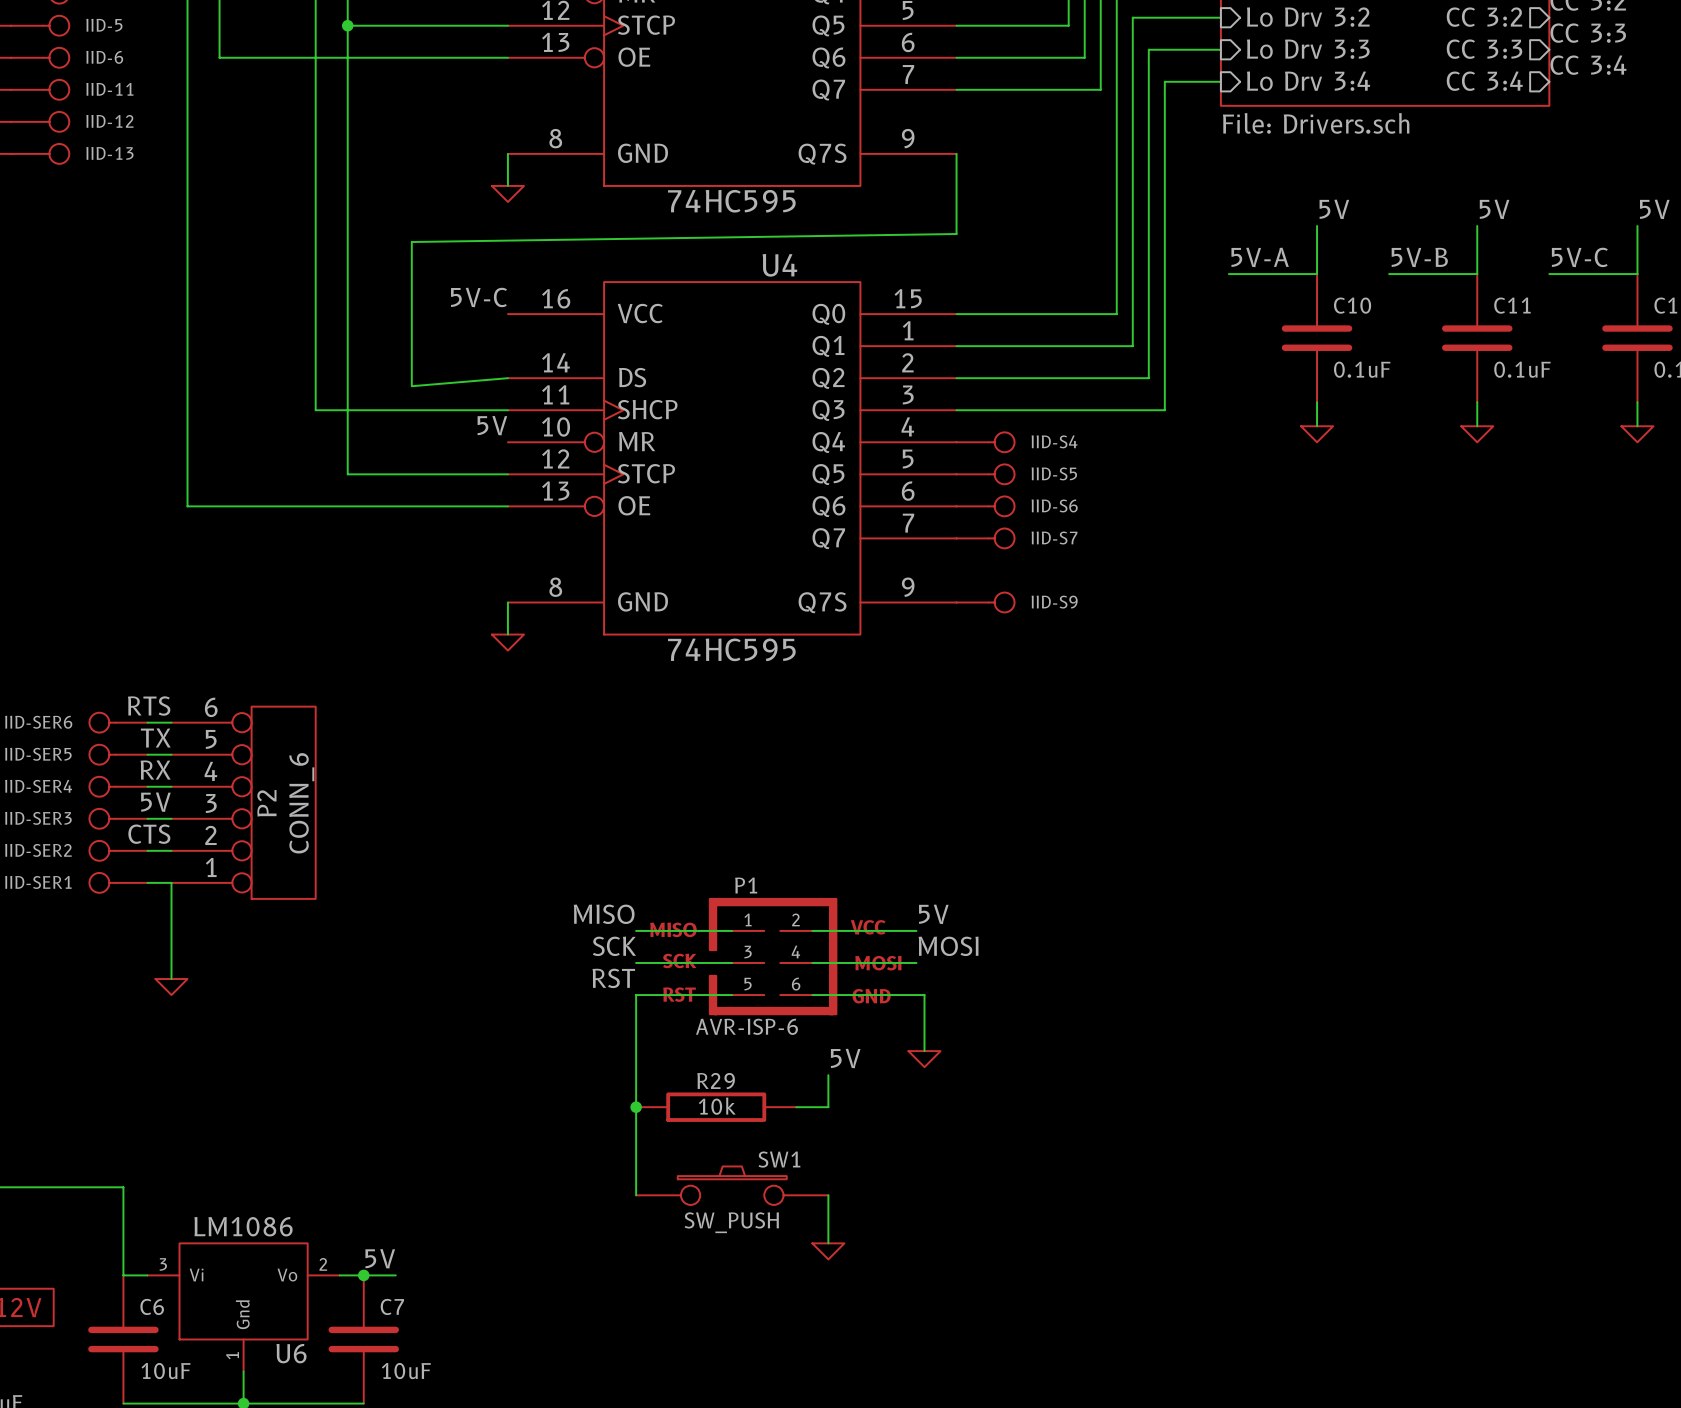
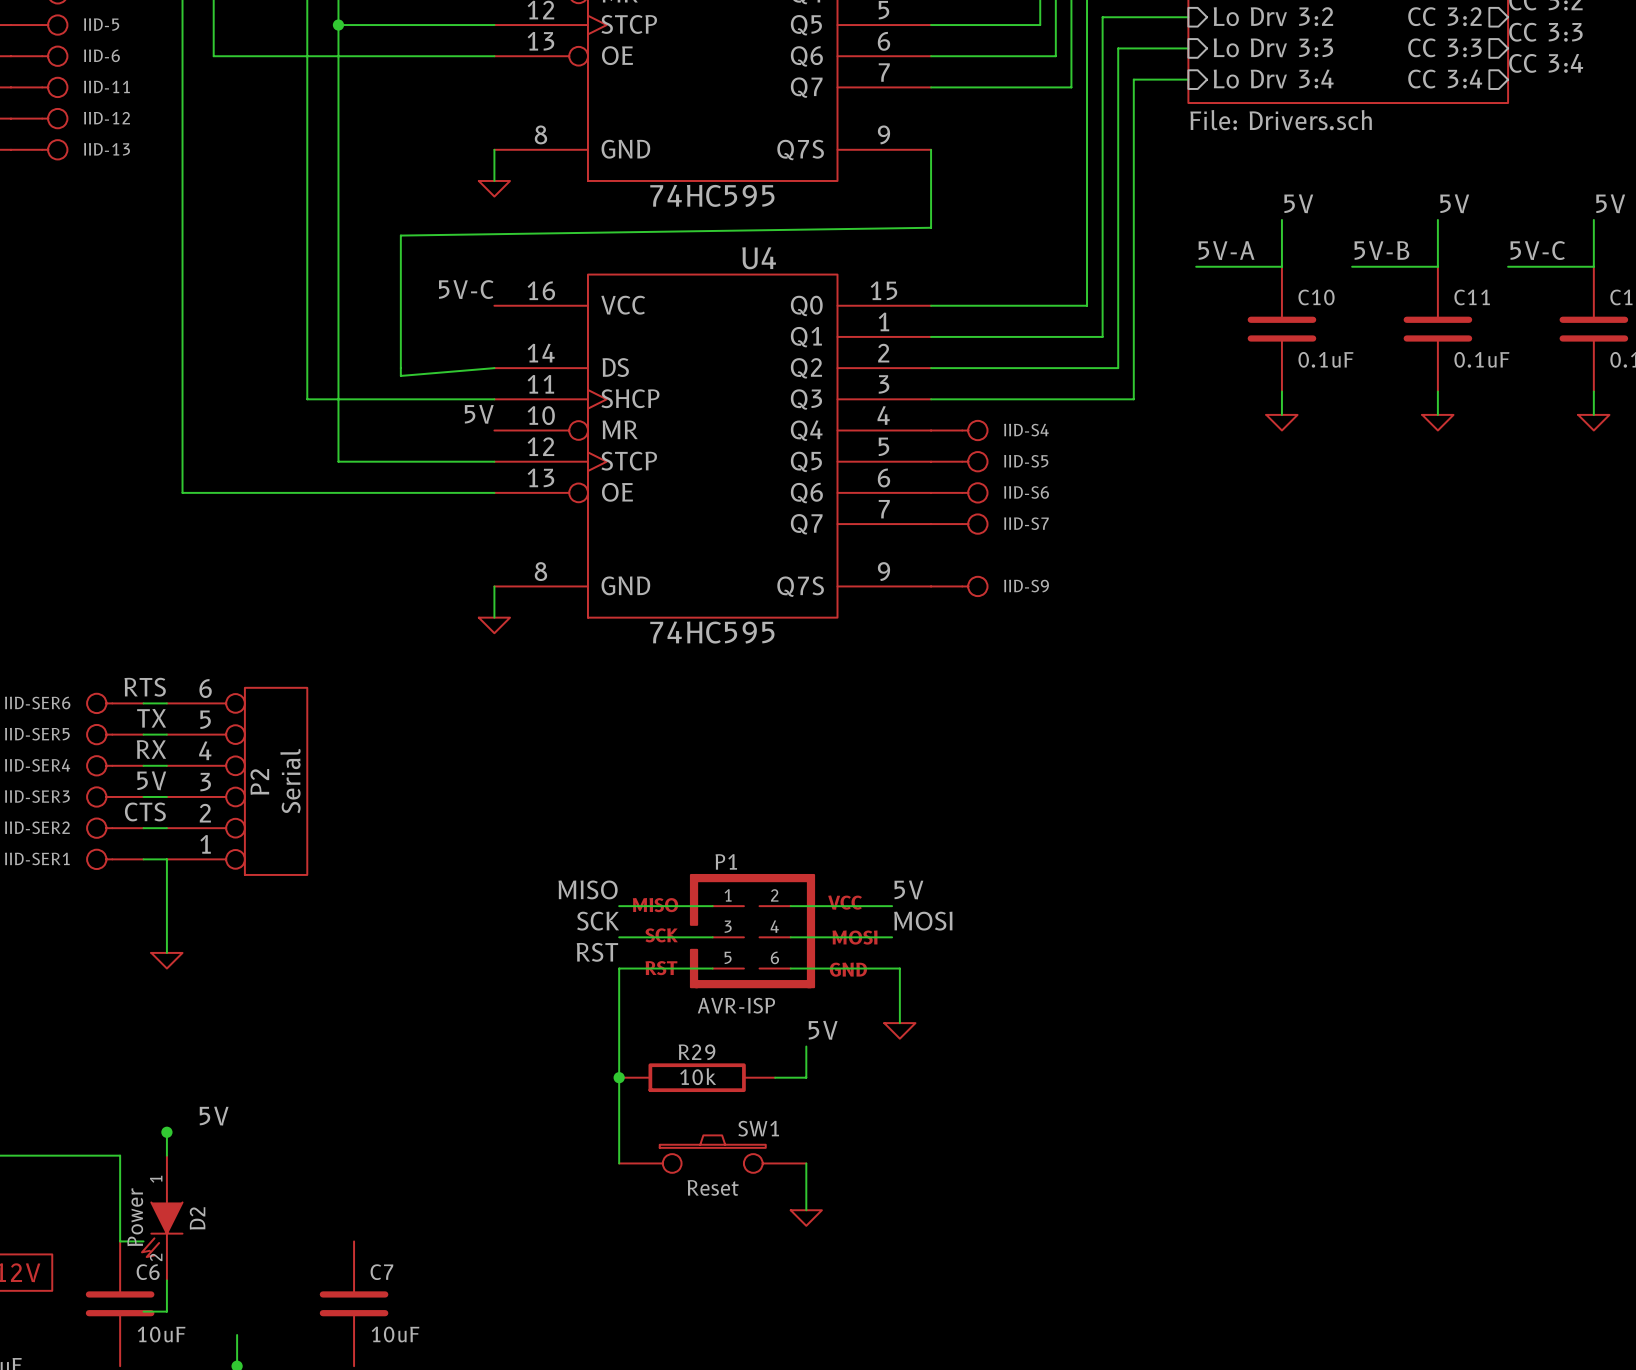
P2 value: CONN_6 (301, 803) -> Serial (290, 781)
P1 value: AVR-ISP-6 (746, 1026) -> AVR-ISP (736, 1005)
wire: none -> (166, 1132) (166, 1155)
junction: none -> (166, 1132)
SW1 value: SW_PUSH (731, 1222) -> Reset (713, 1187)
D2: none -> Power (162, 1218)
label position: 5V (380, 1258) -> 5V (214, 1116)
wire: (339, 1275) (395, 1275) -> none
junction: (363, 1275) -> none
U6: LM1086 (243, 1307) -> none
wire: none -> (166, 1280) (166, 1311) (143, 1311)
wire: (123, 1403) (363, 1403) -> none

